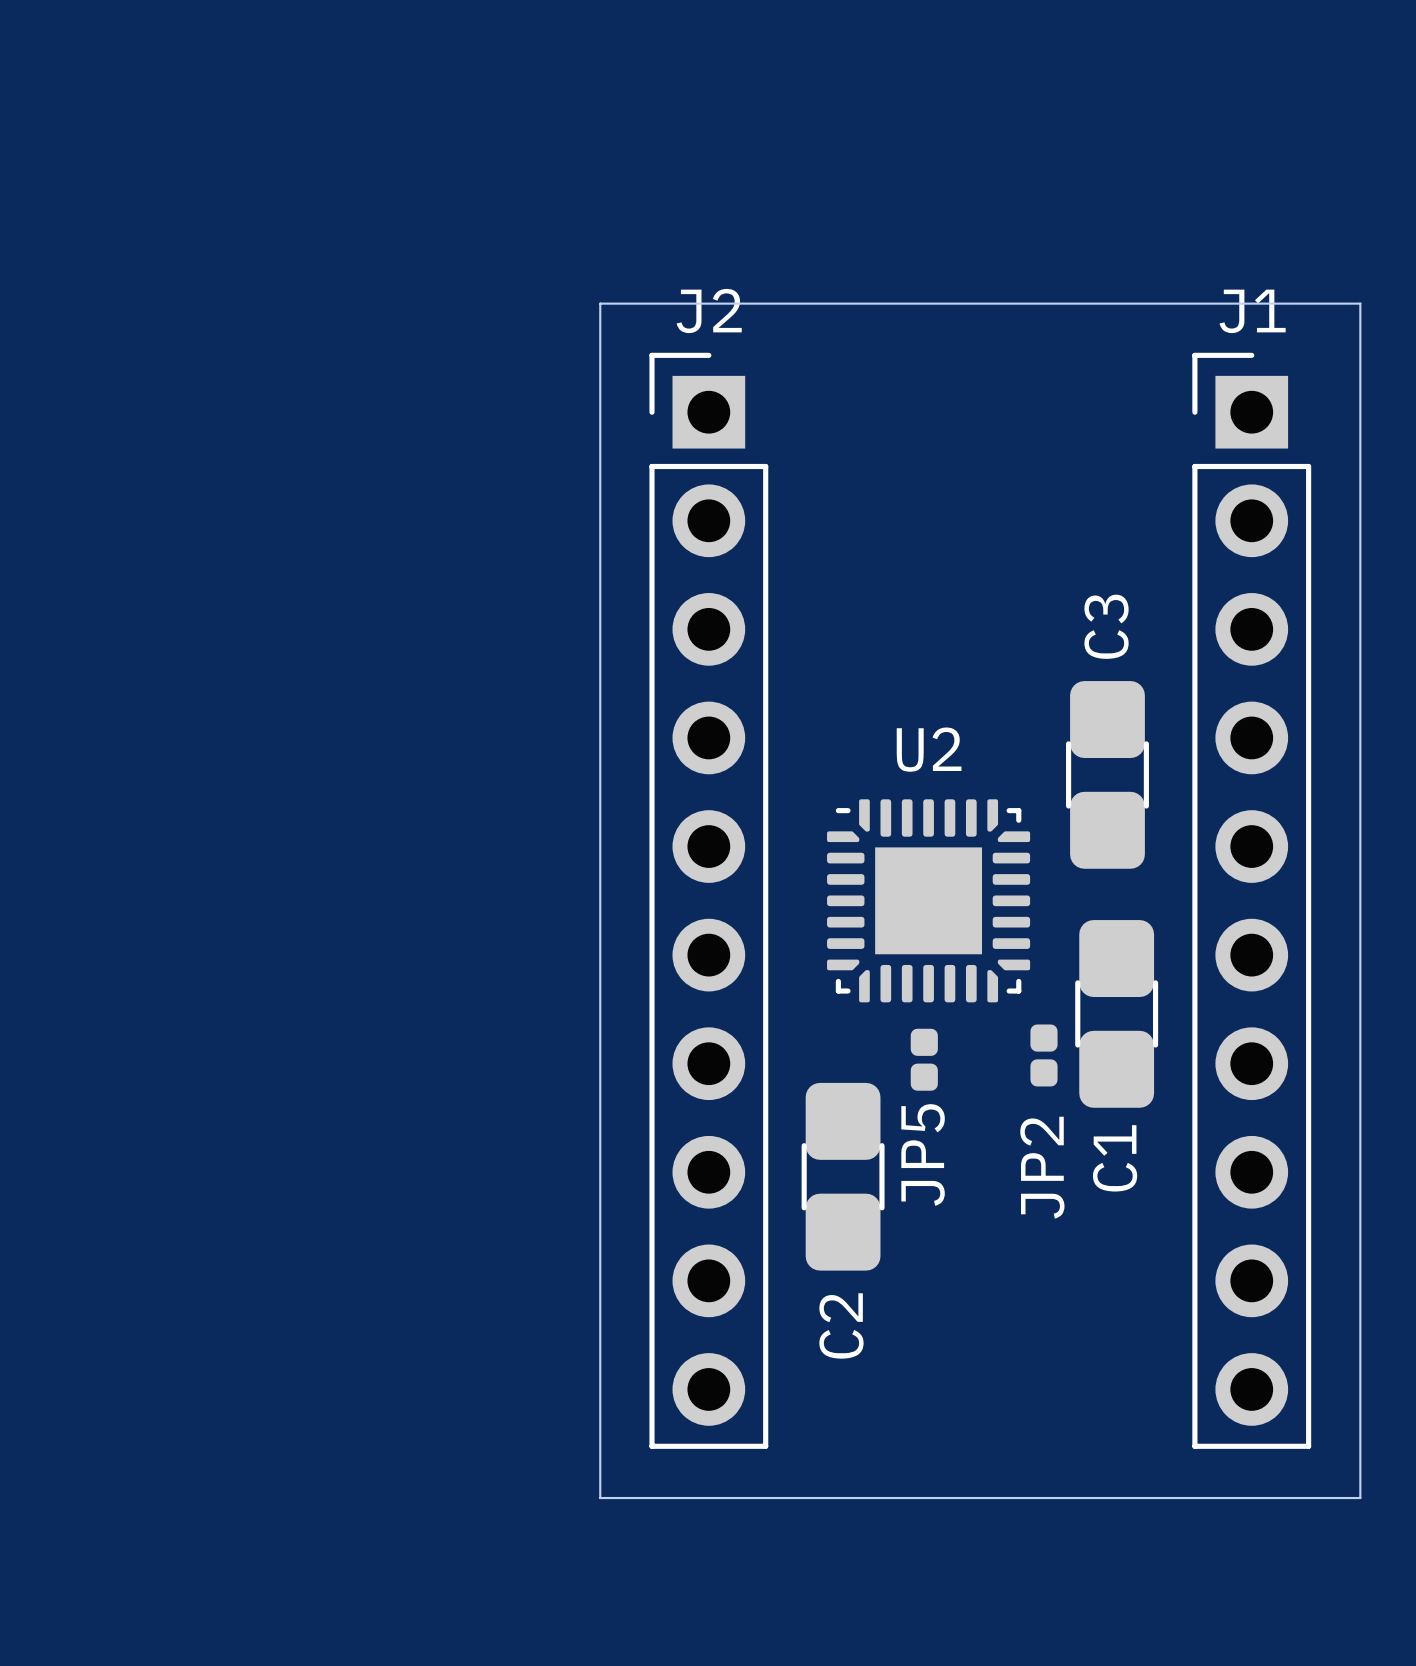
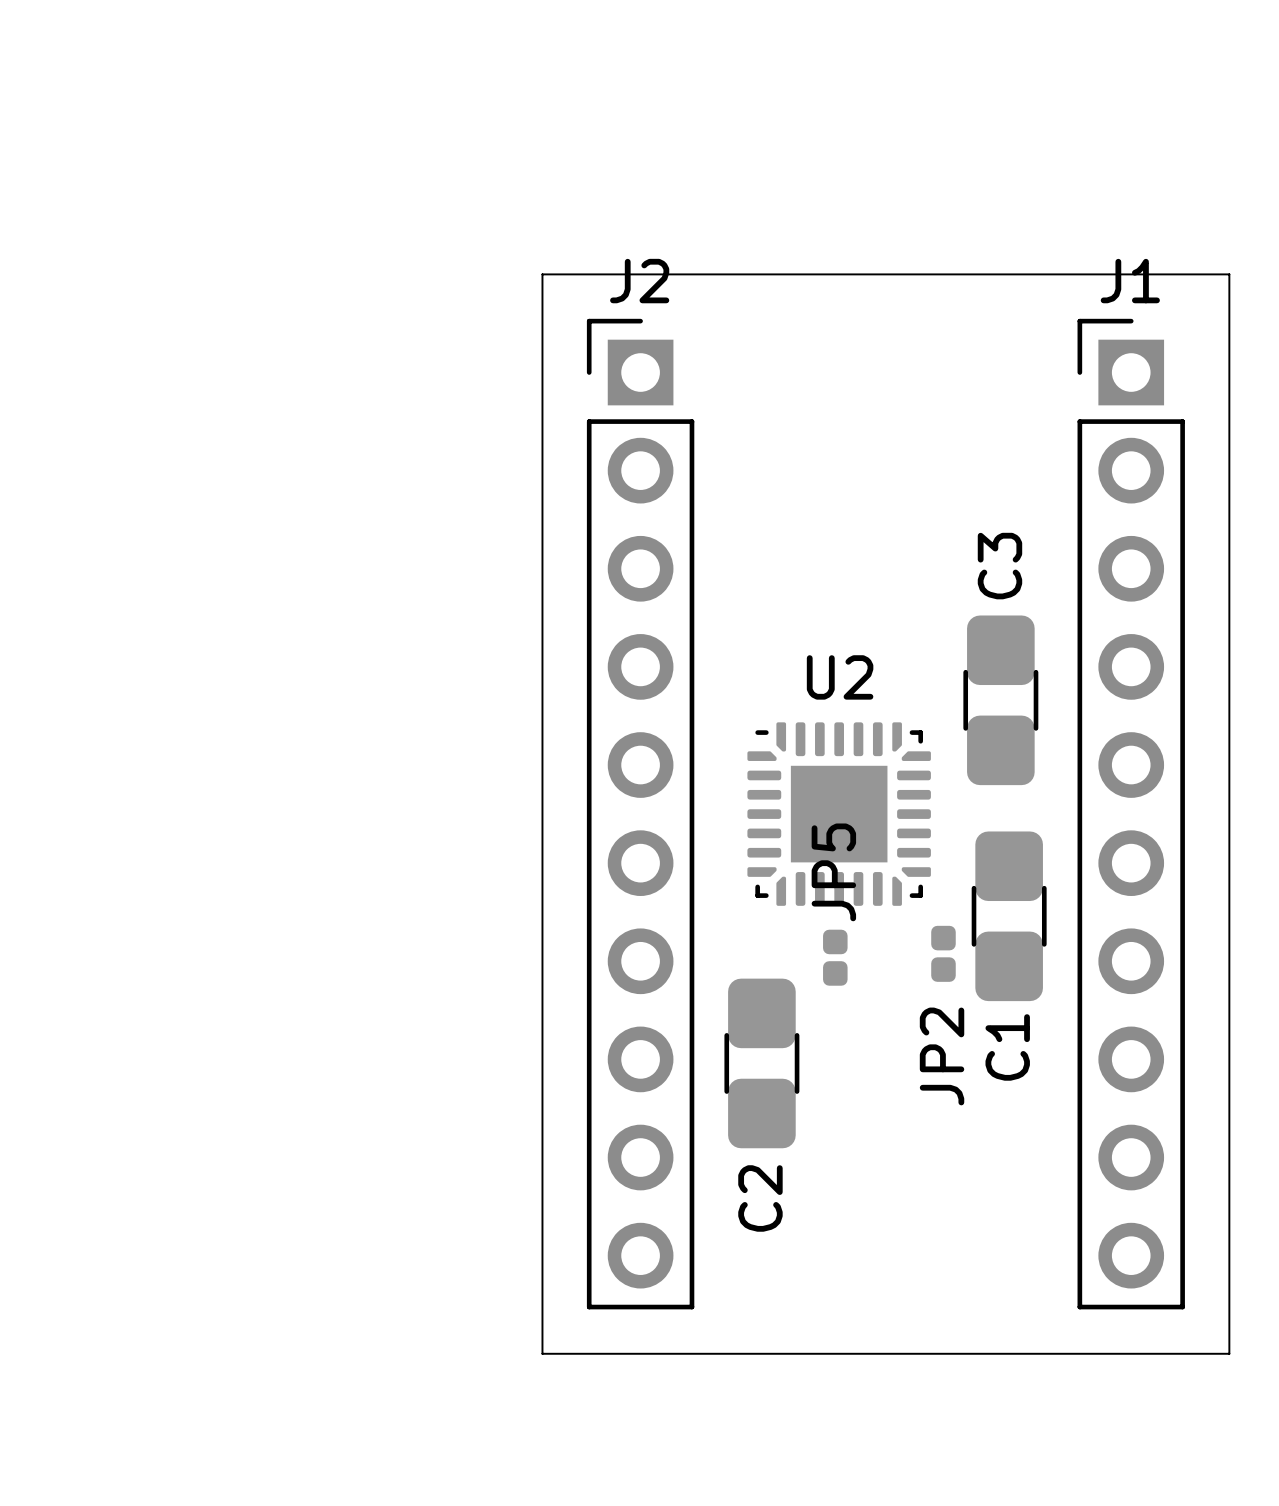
JP5 name position: JP5 (923, 1154) -> JP5 (833, 872)

